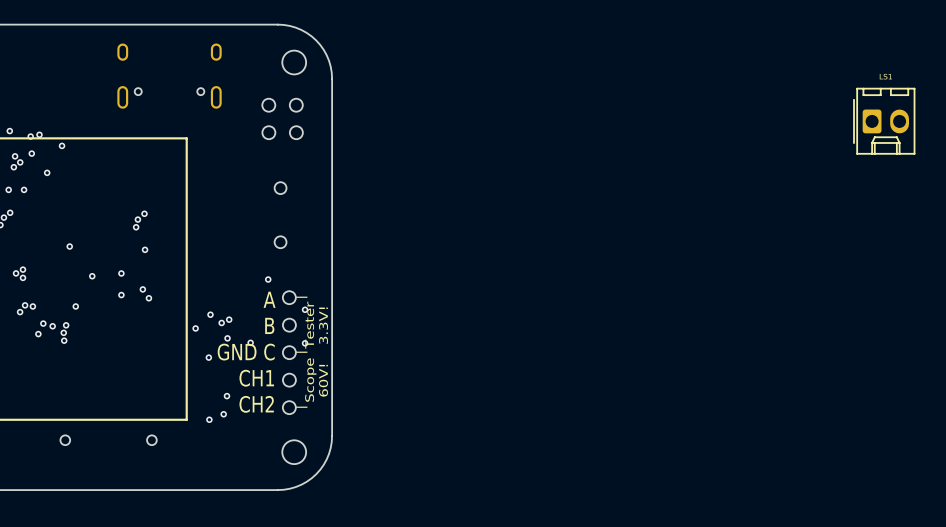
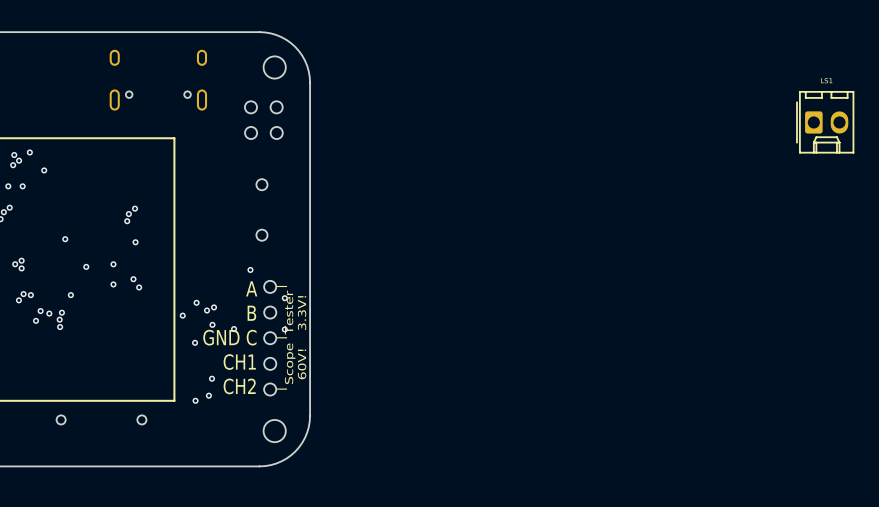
via: (9, 131) -> none
via: (39, 134) -> none
via: (30, 136) -> none
via: (62, 145) -> none

